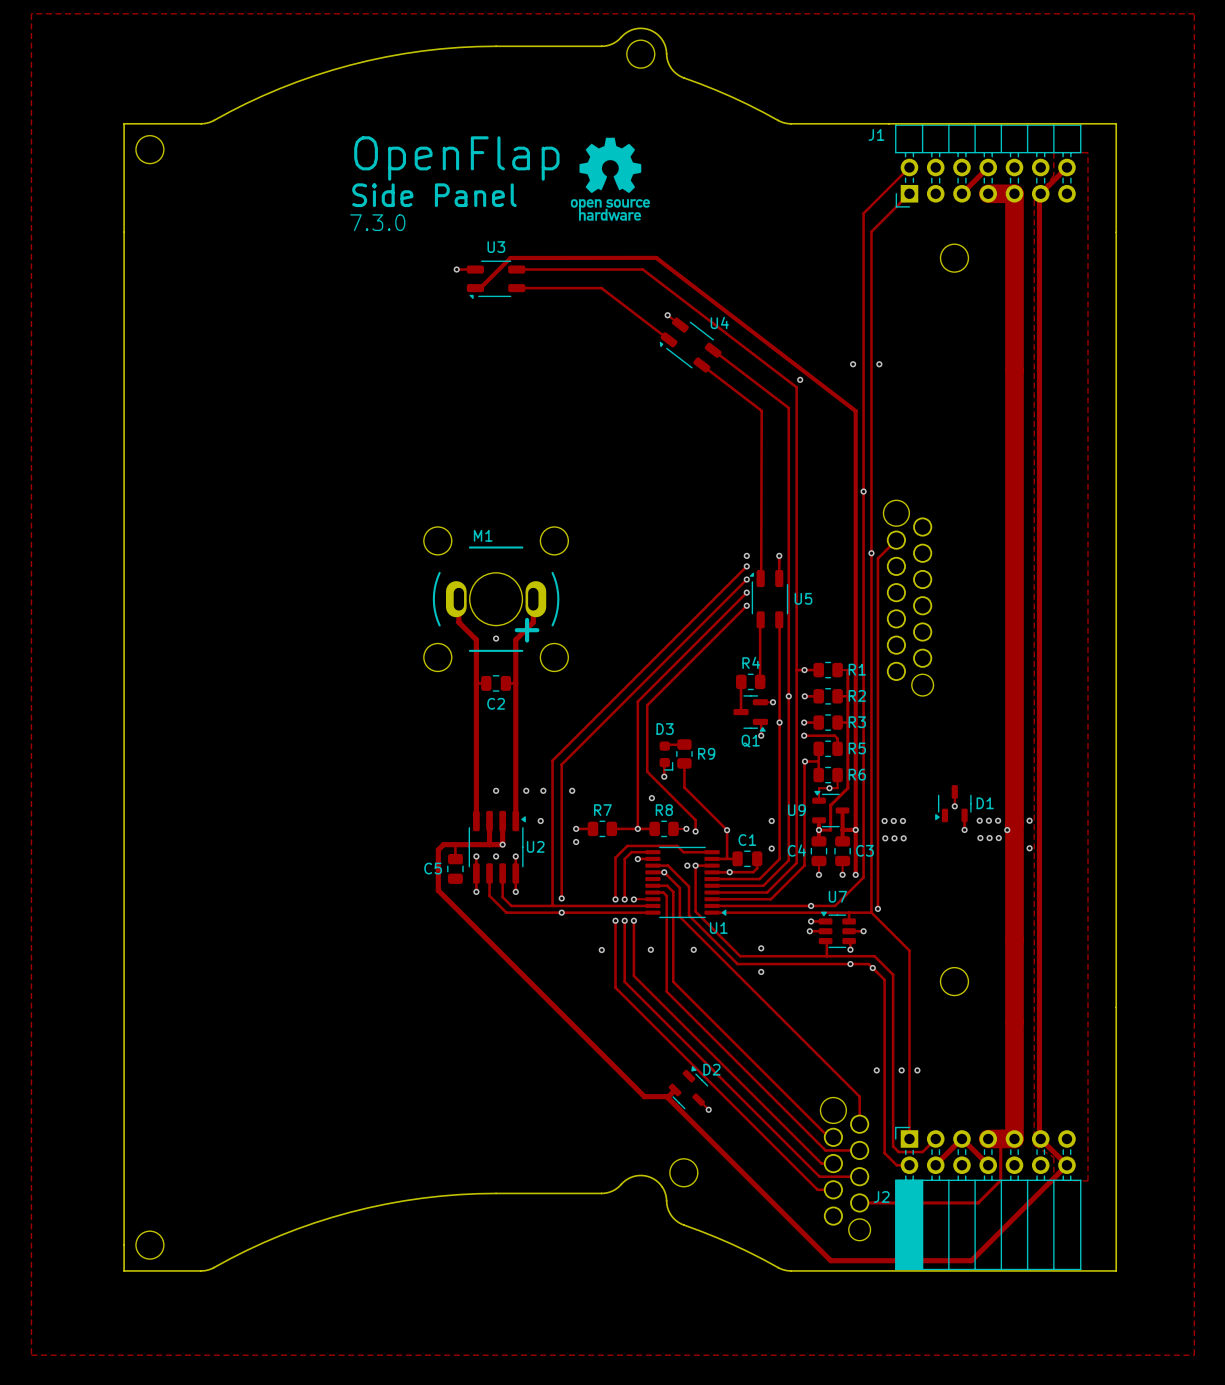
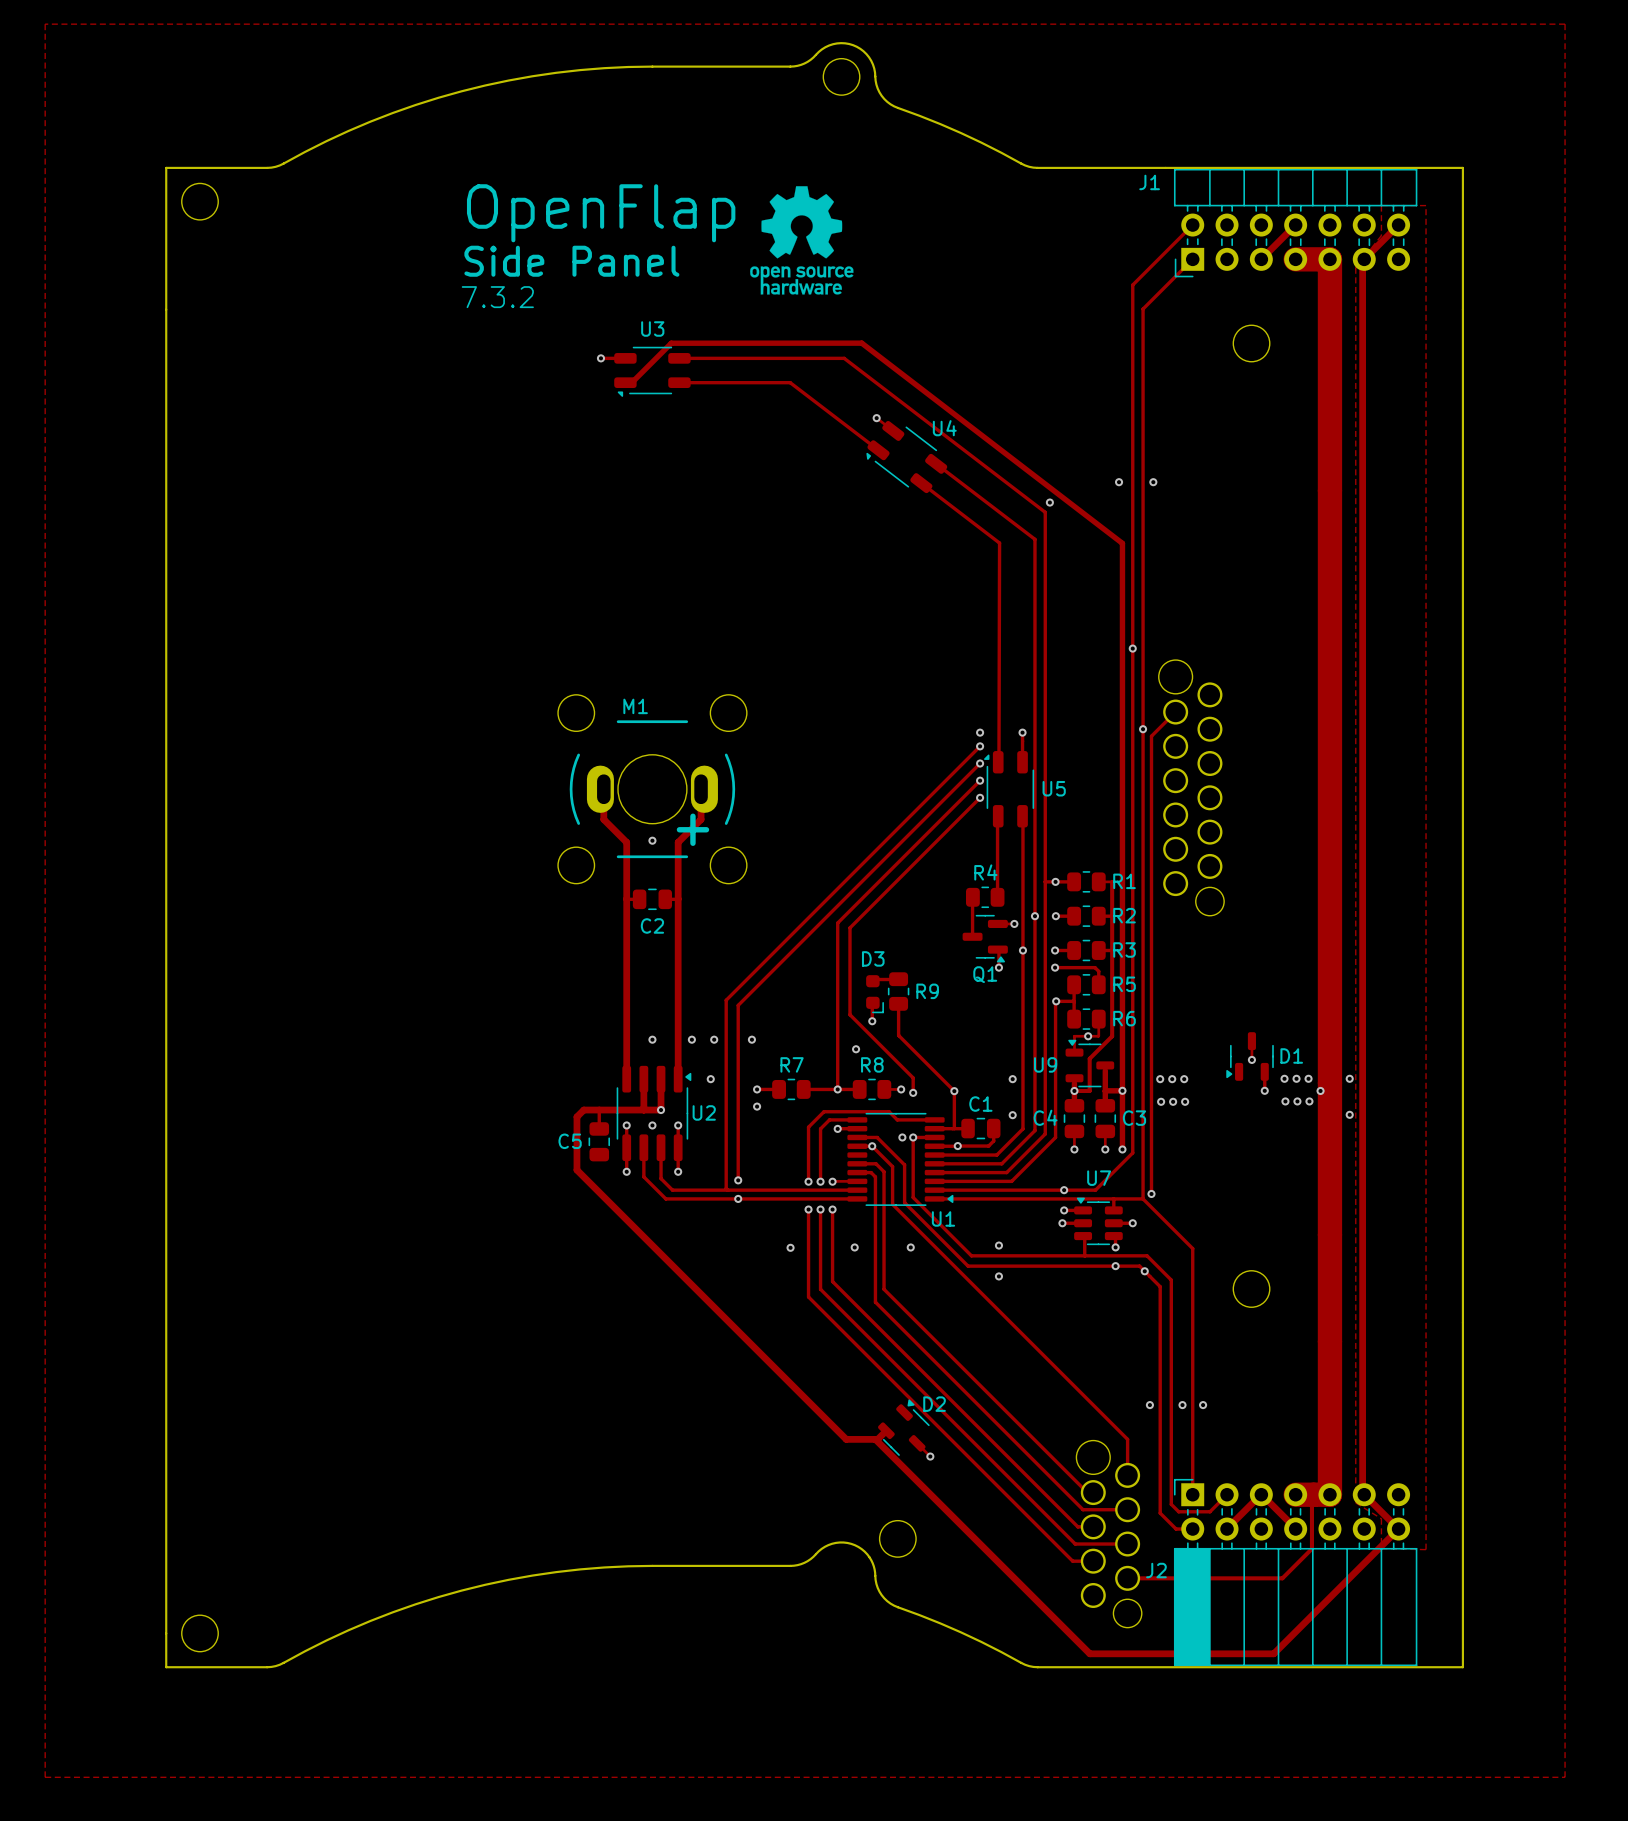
text: 7.3.0 (377, 222) -> 7.3.2 (497, 297)

